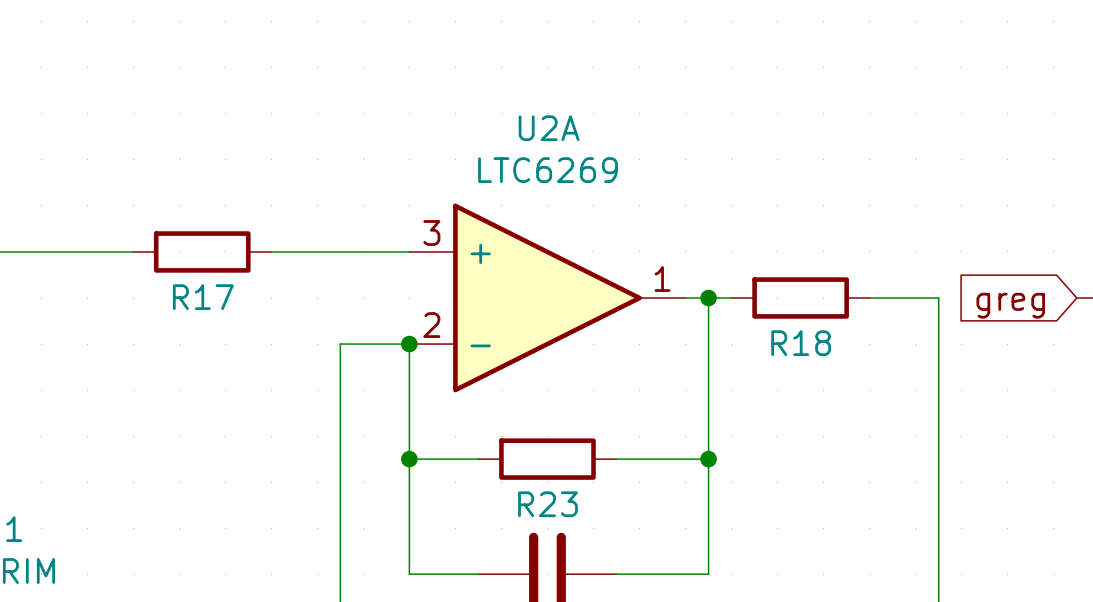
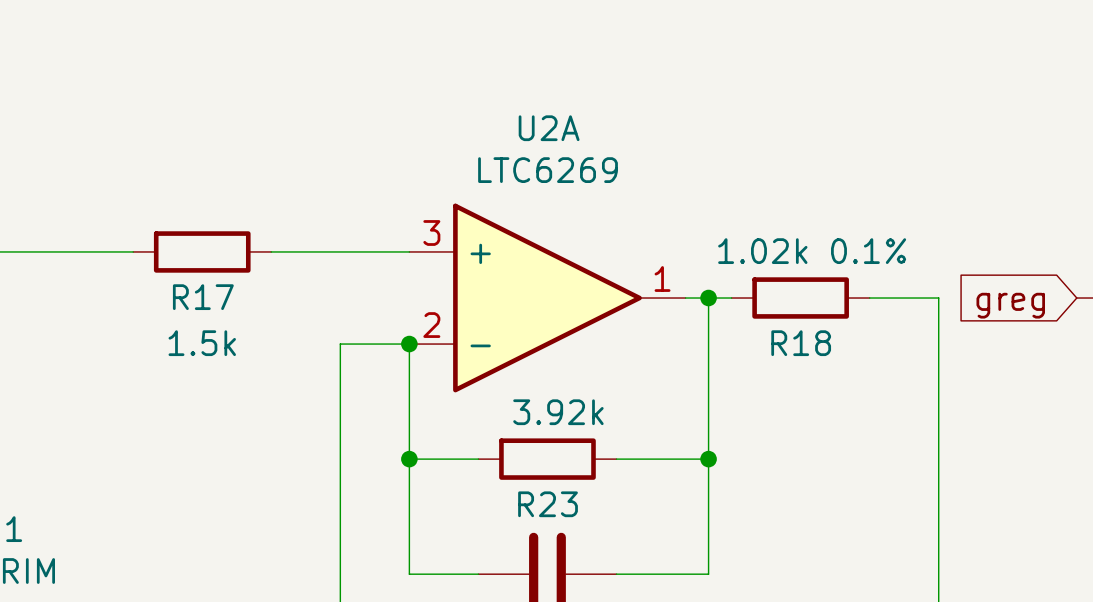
R18 value: none -> 1.02k 0.1% (812, 251)
R17 value: none -> 1.5k (202, 343)
R23 value: none -> 3.92k (558, 412)

